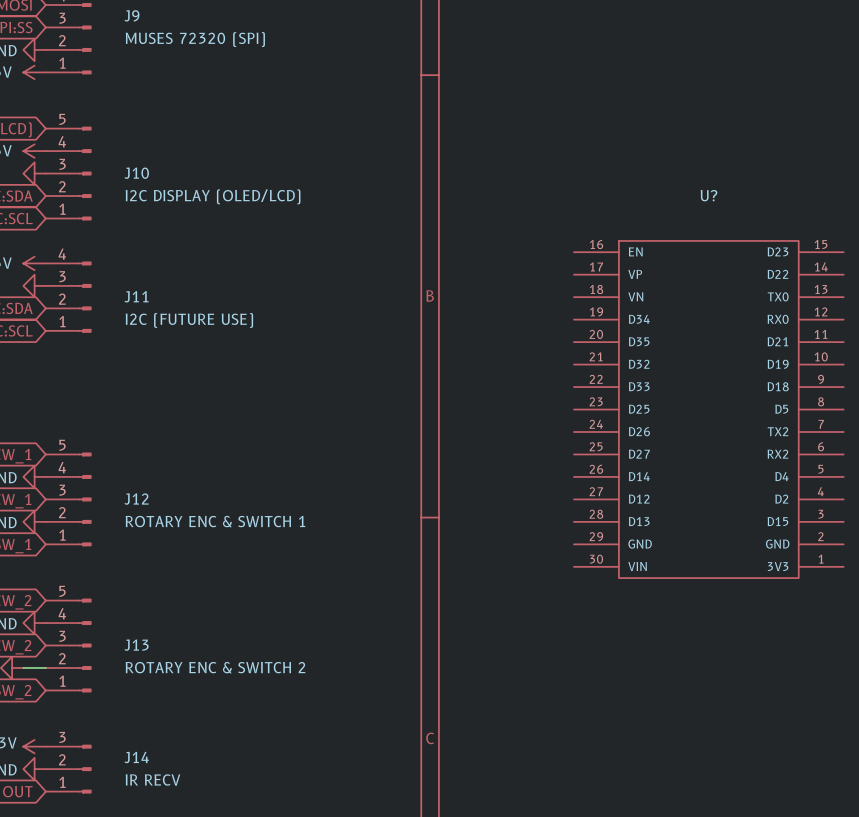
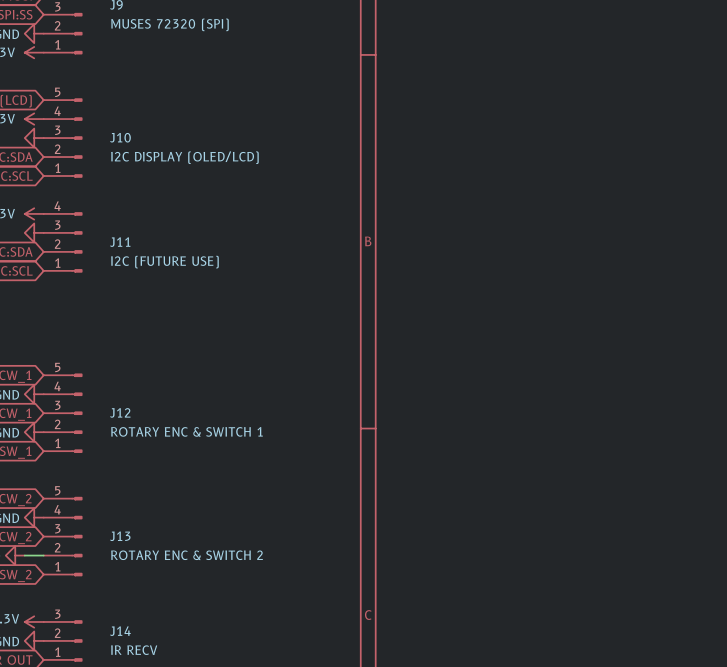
U?: (708, 409) -> none

